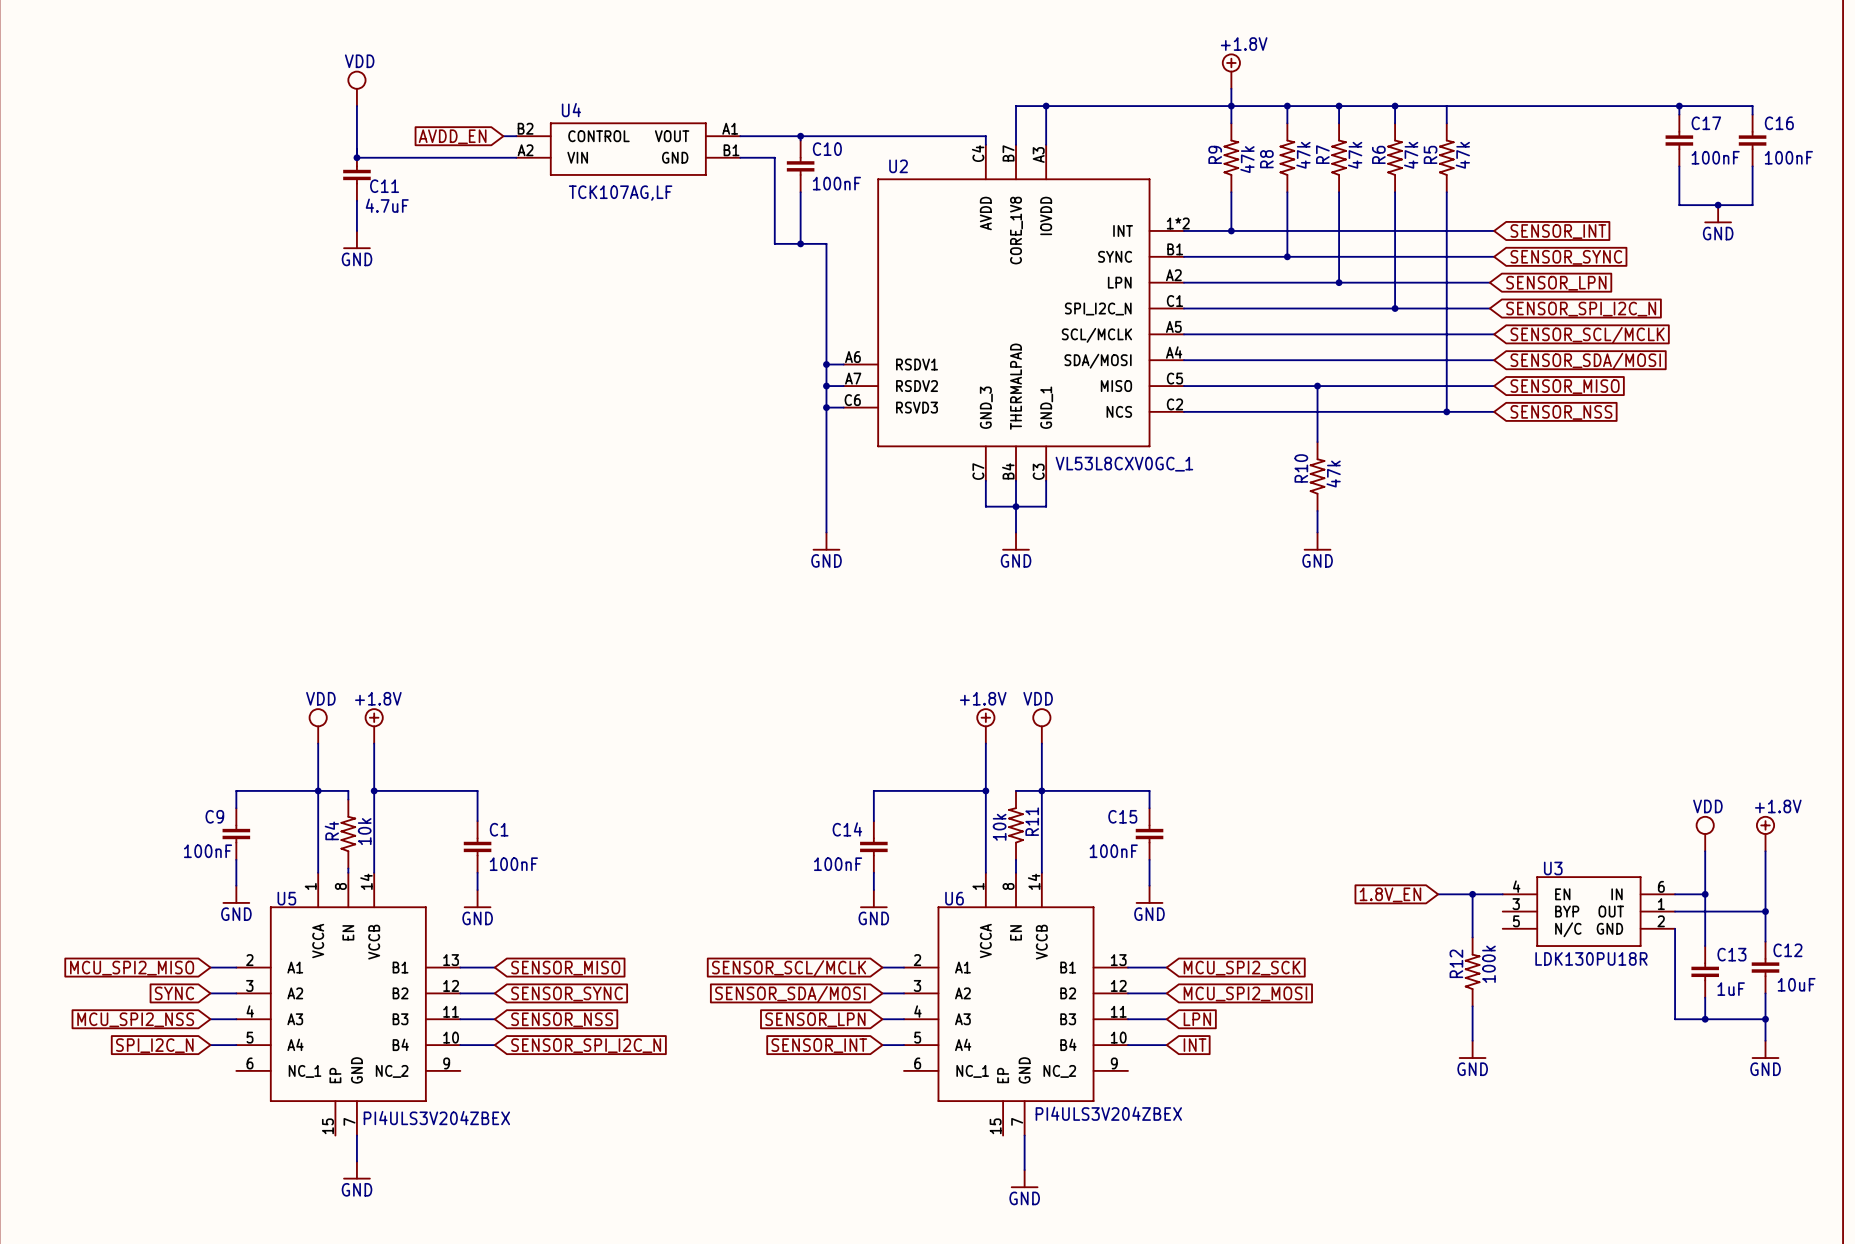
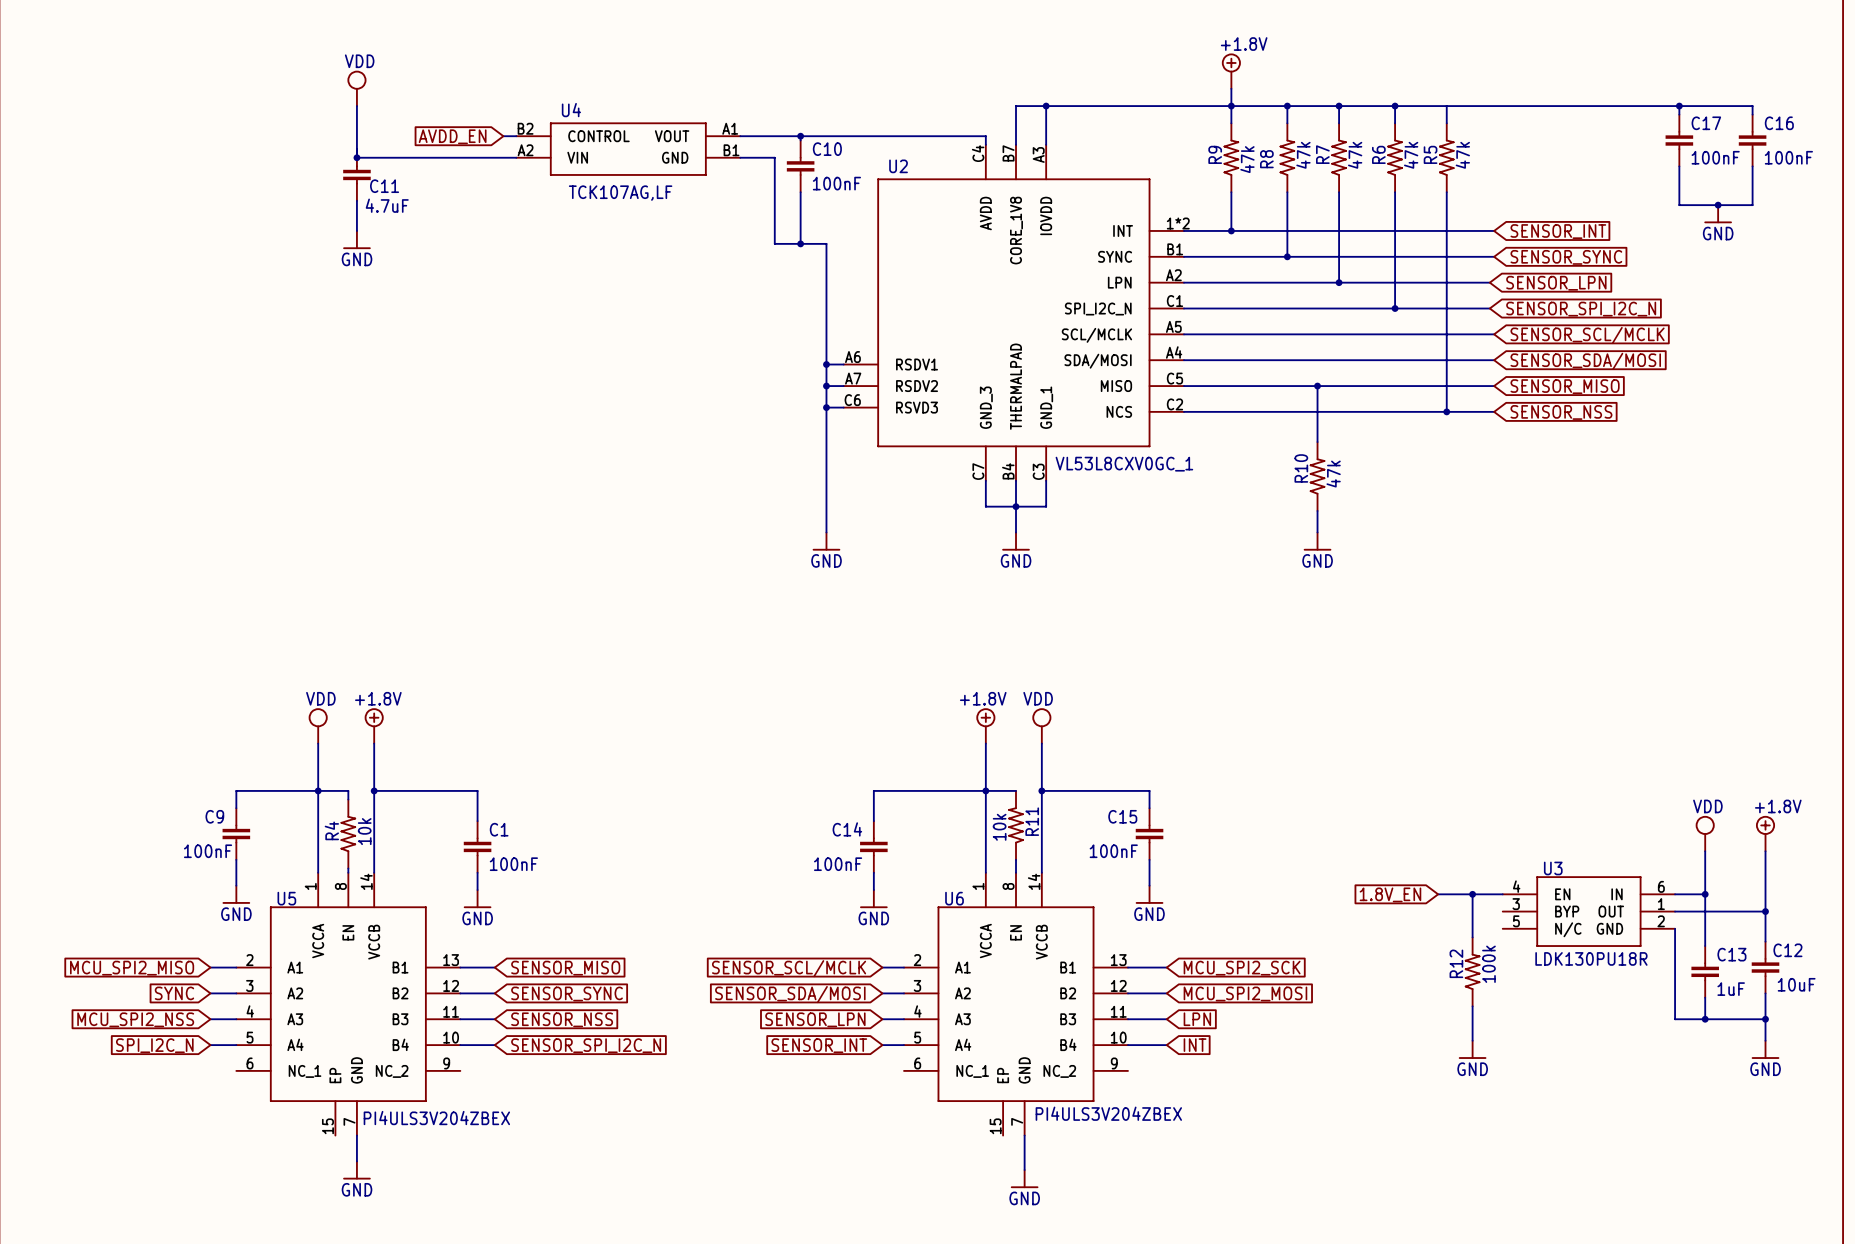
wire: (1016, 790) (1041, 790) -> (1016, 790) (985, 790)

